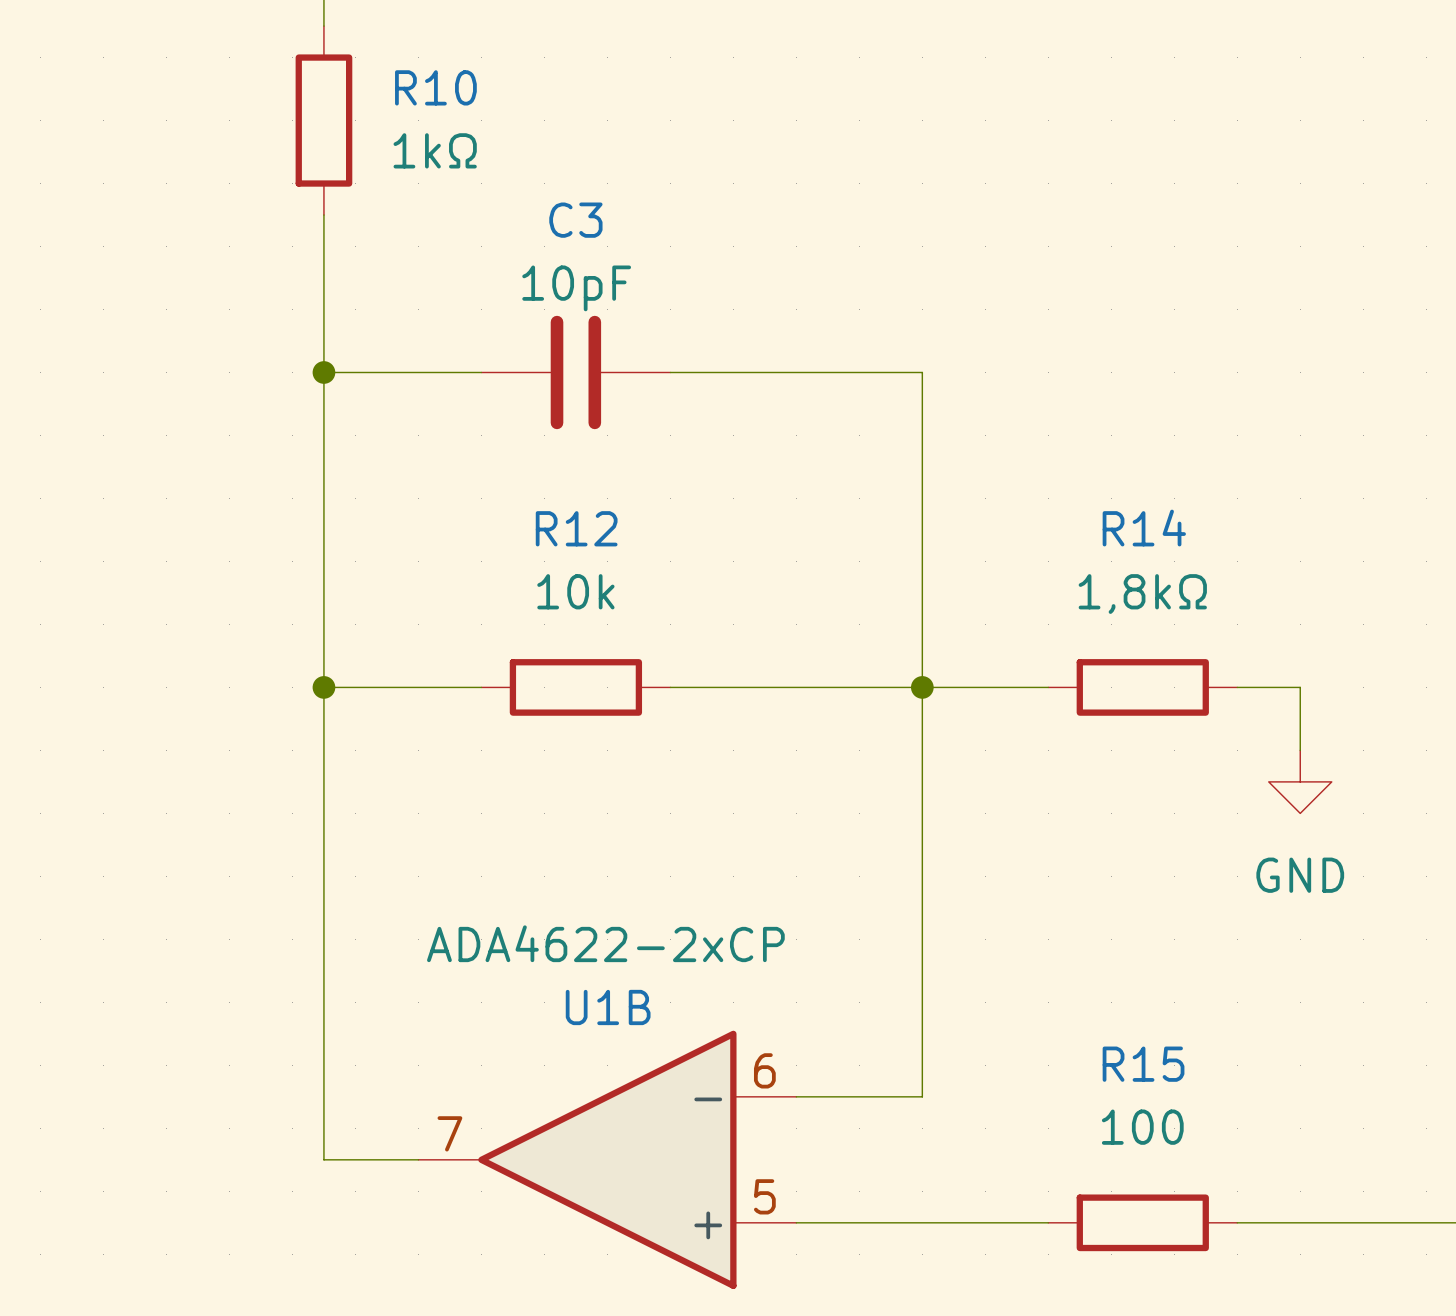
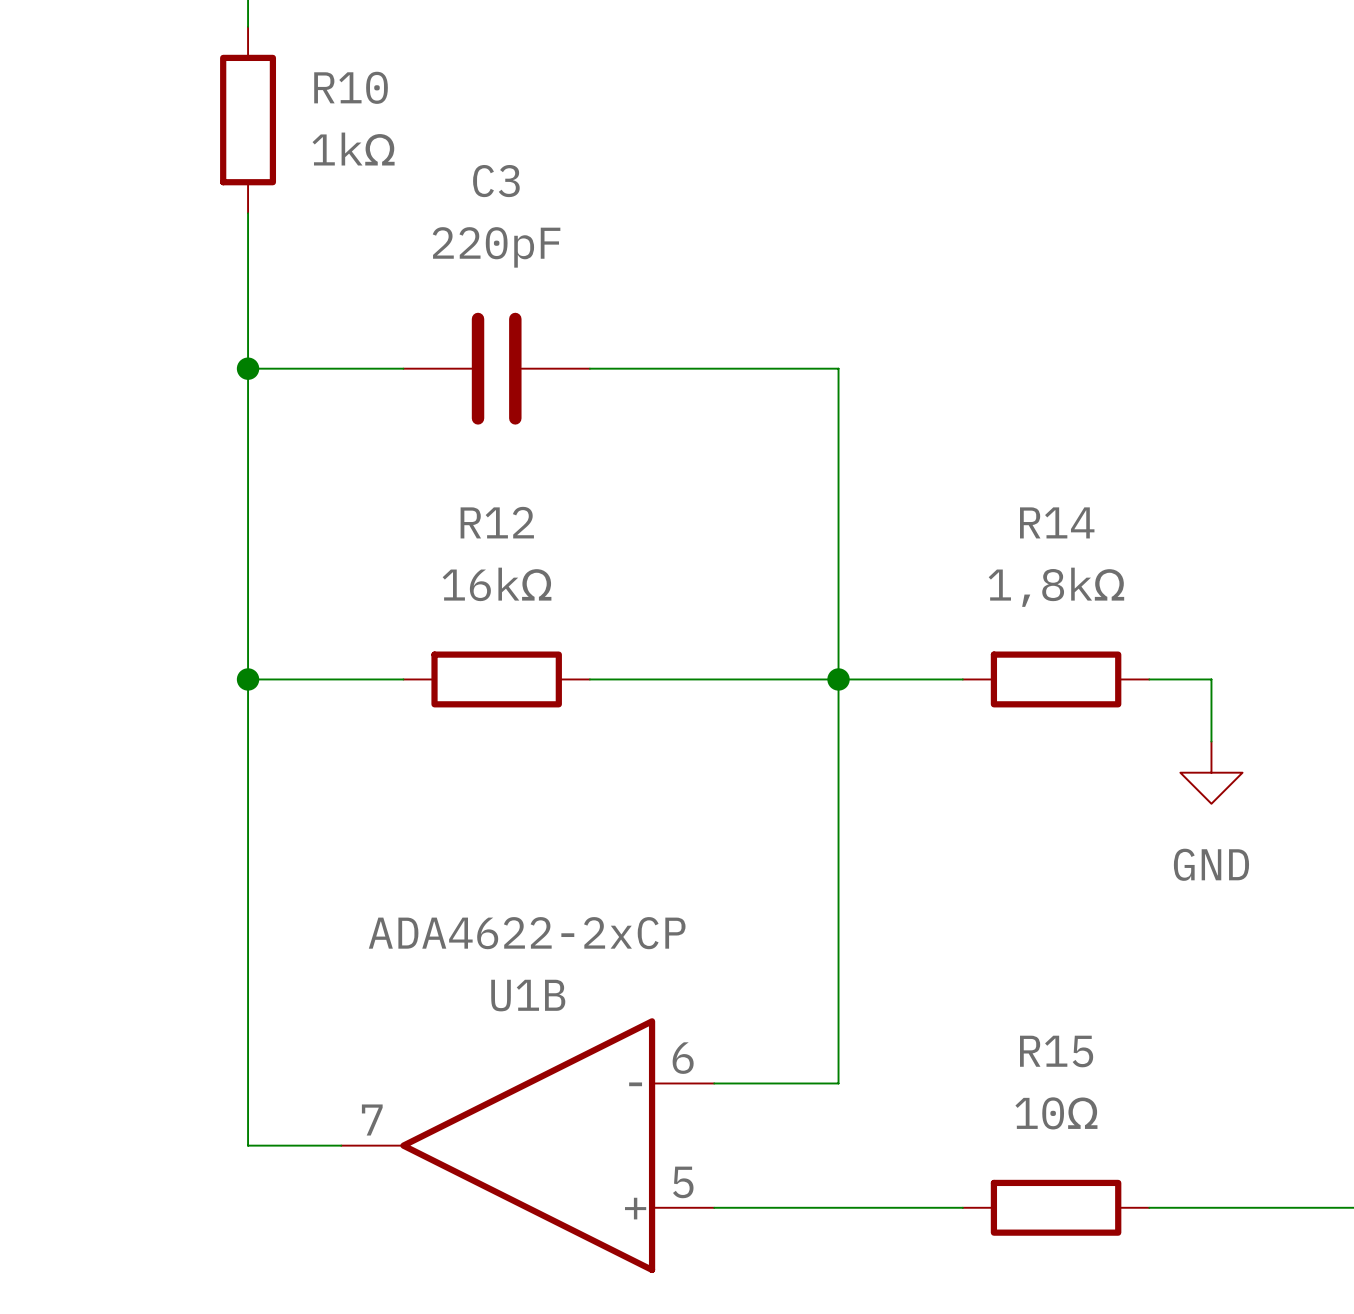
C3 name position: C3 (575, 220) -> C3 (496, 181)
C3 value: 10pF (576, 288) -> 220pF (496, 247)
R12 value: 10k (575, 591) -> 16kΩ (497, 584)
R15 value: 100 (1142, 1127) -> 10Ω (1056, 1113)

